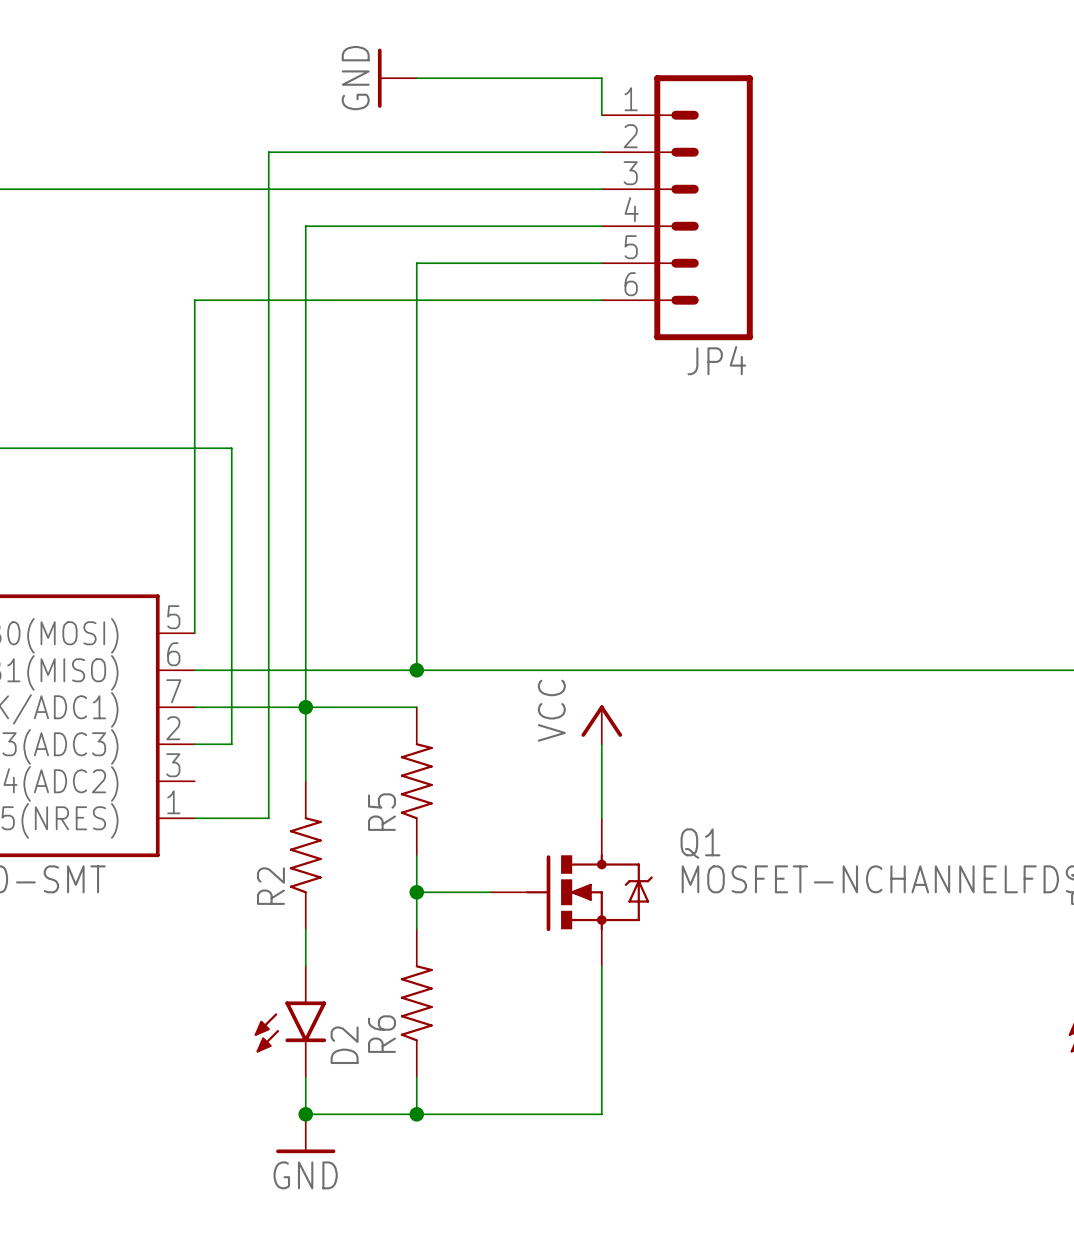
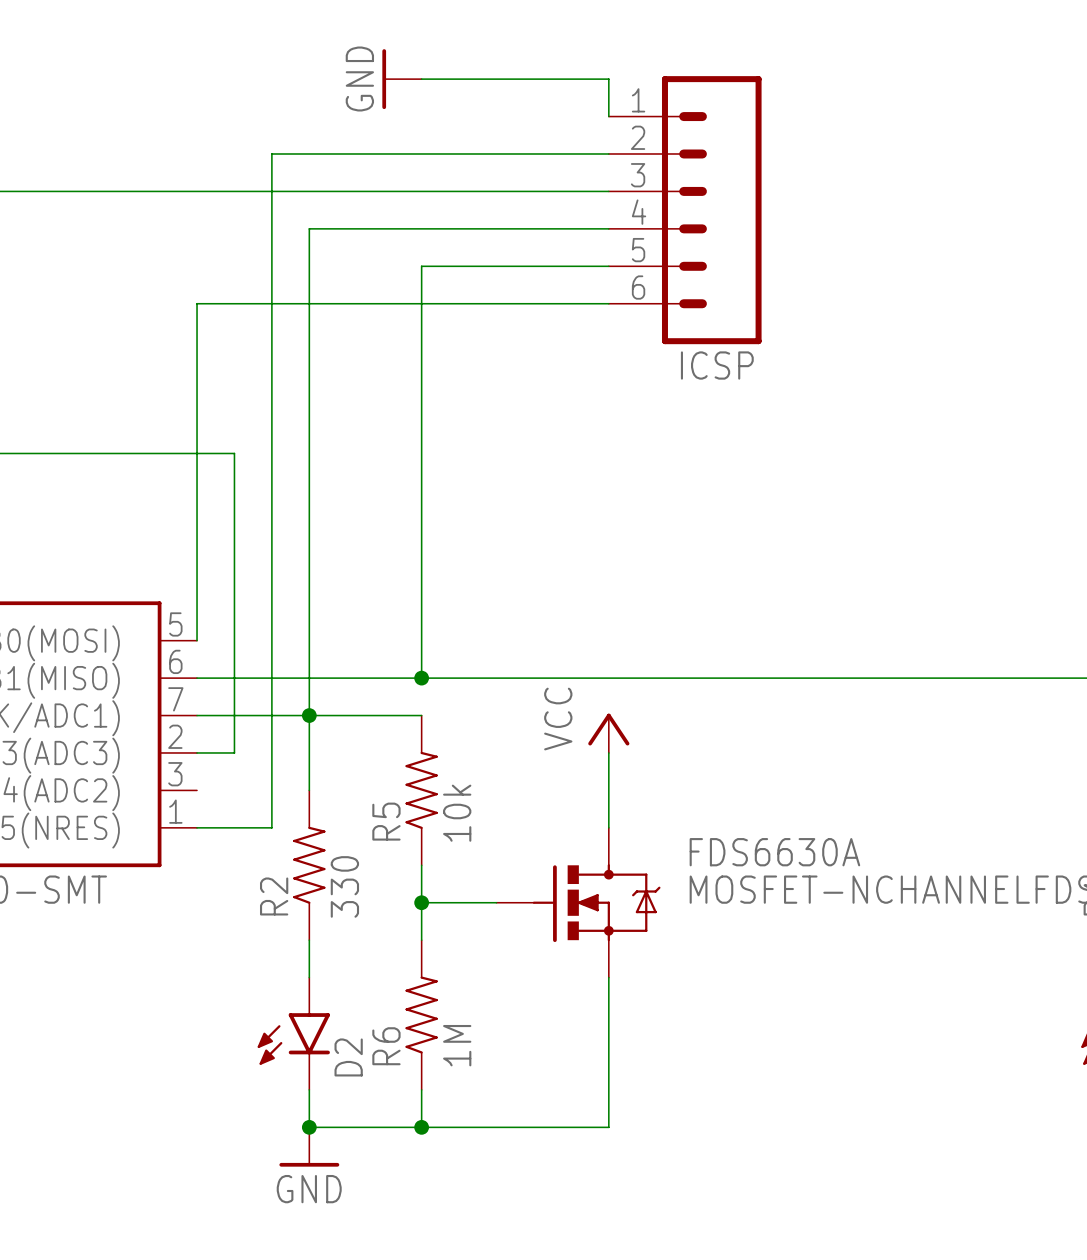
JP4 name: JP4 (716, 360) -> ICSP (717, 365)
R5 value: none -> 10k (457, 813)
Q1 name: Q1 (700, 843) -> FDS6630A (774, 852)
R2 value: none -> 330 (344, 886)
R6 value: none -> 1M (457, 1045)

